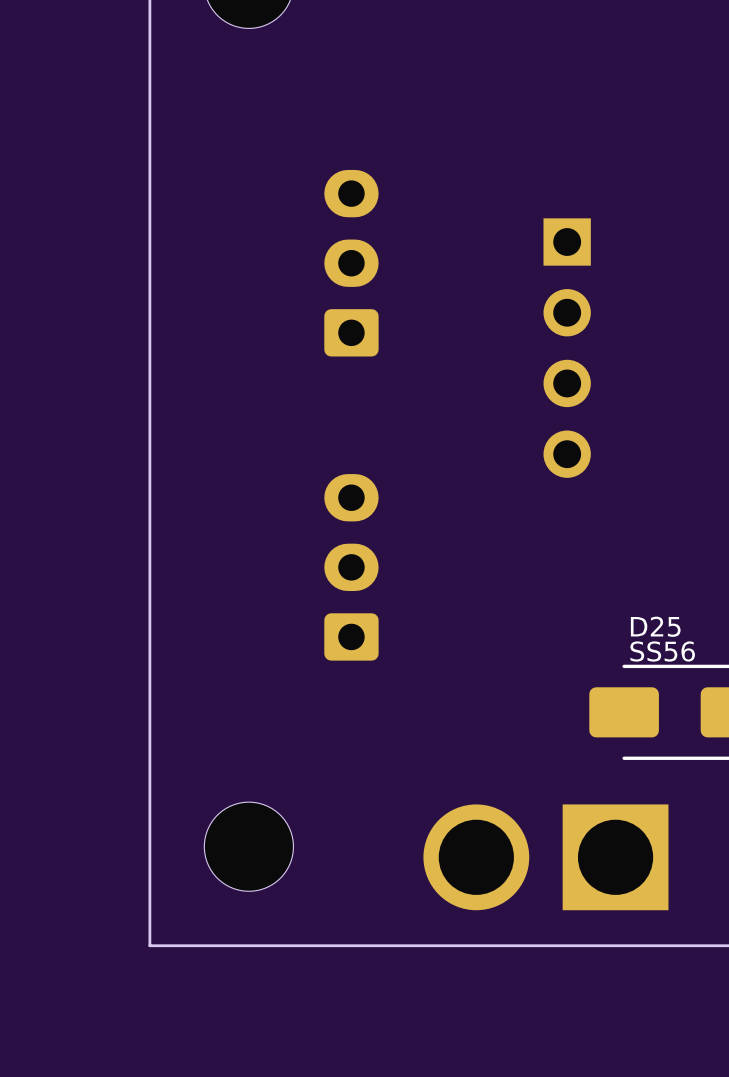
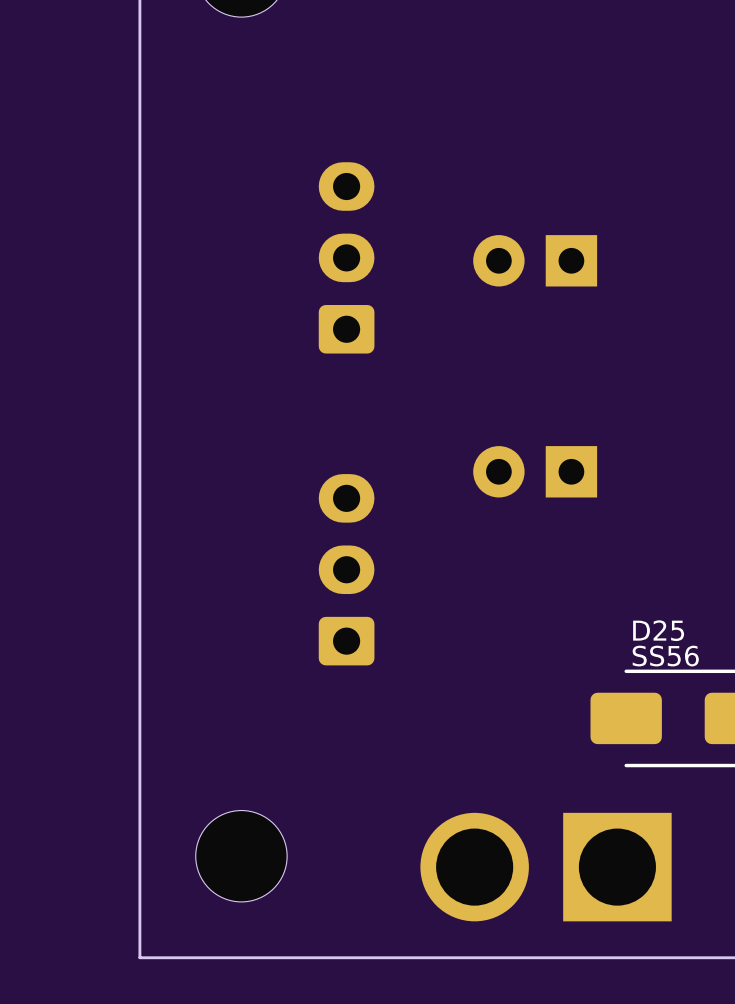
part: none -> (535, 260)
part: (567, 348) -> none
part: none -> (535, 471)

